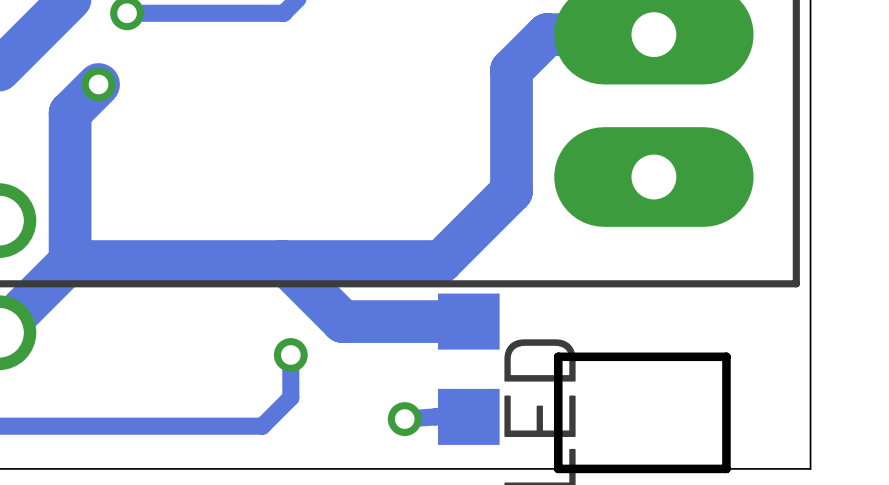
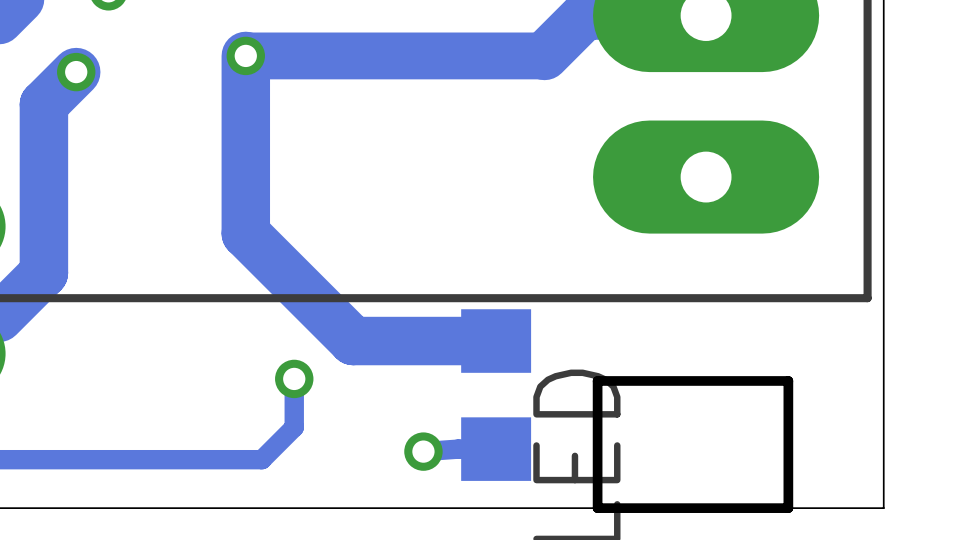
via: none -> (245, 55)
track: (511, 70) (511, 191) (441, 261) (70, 261) -> (544, 55) (245, 55) (245, 233) (285, 272)

